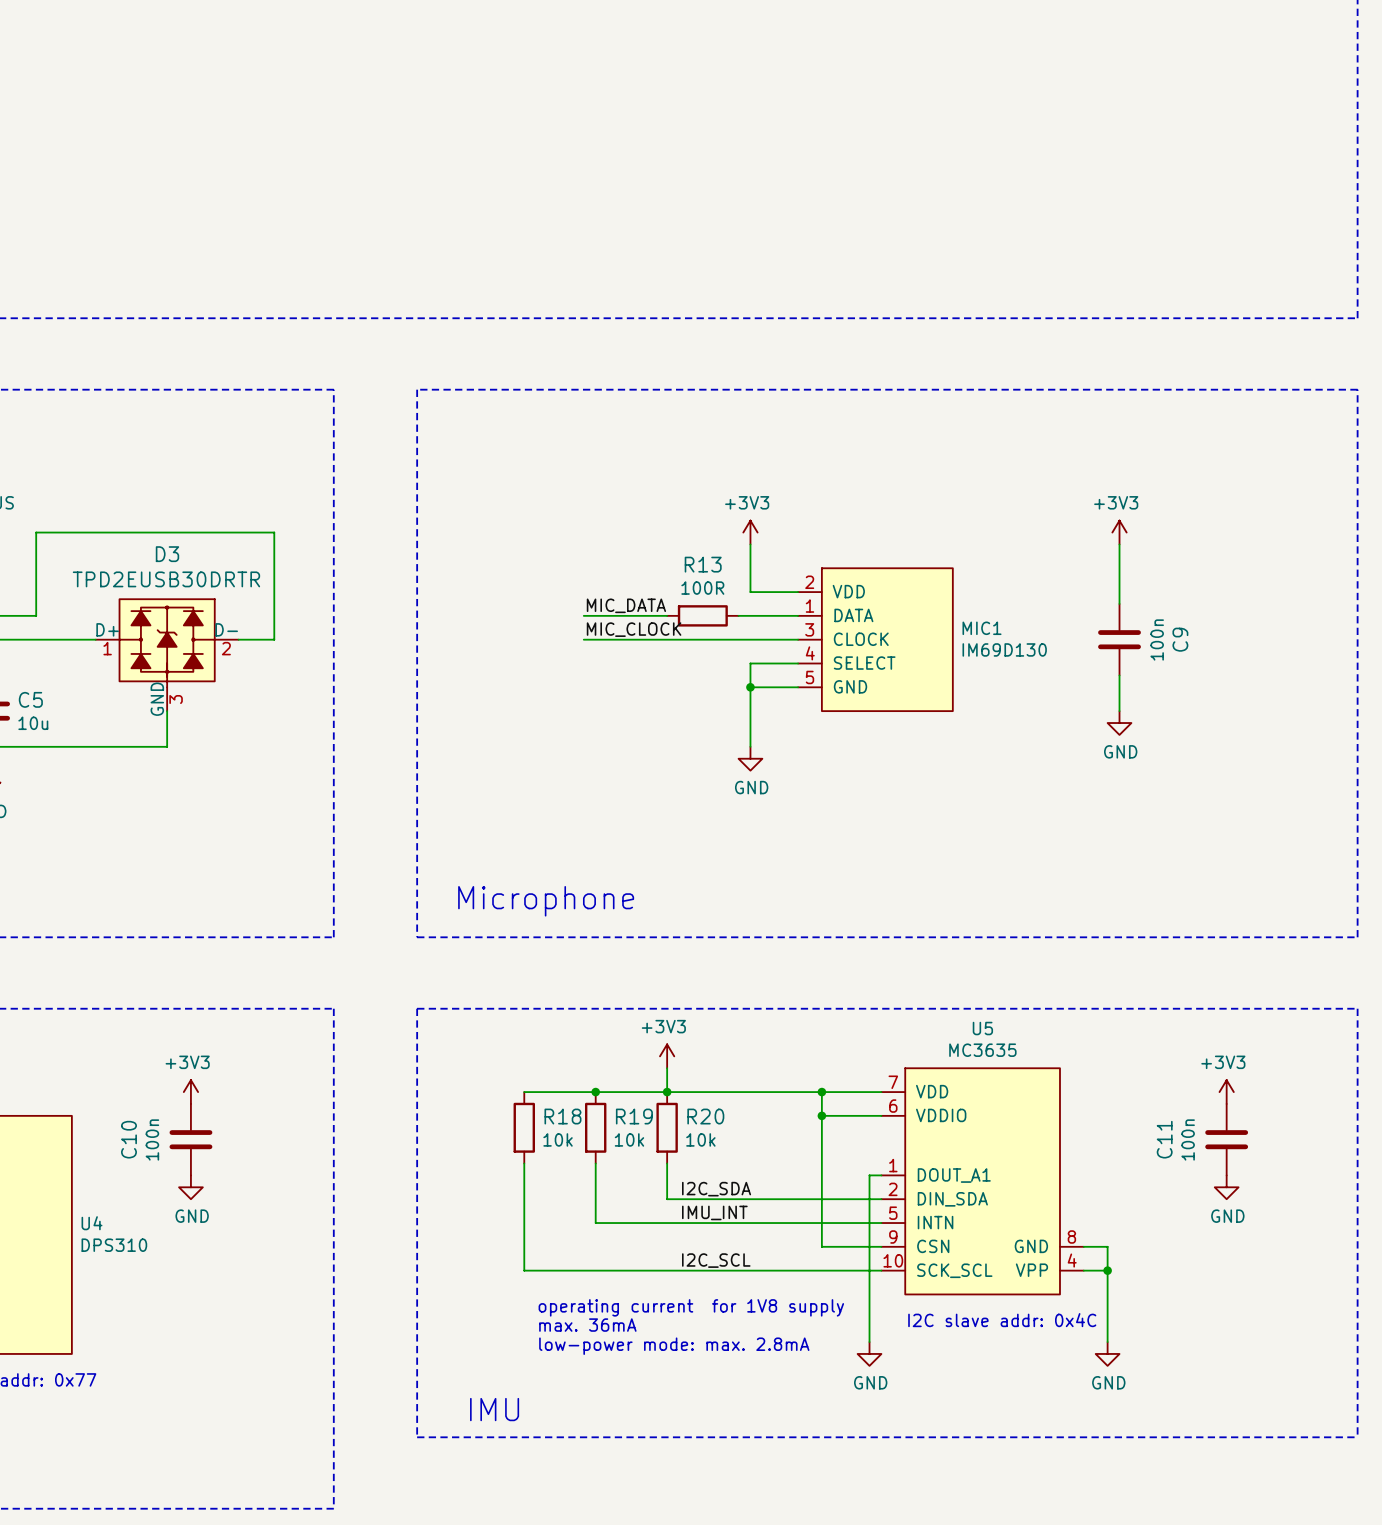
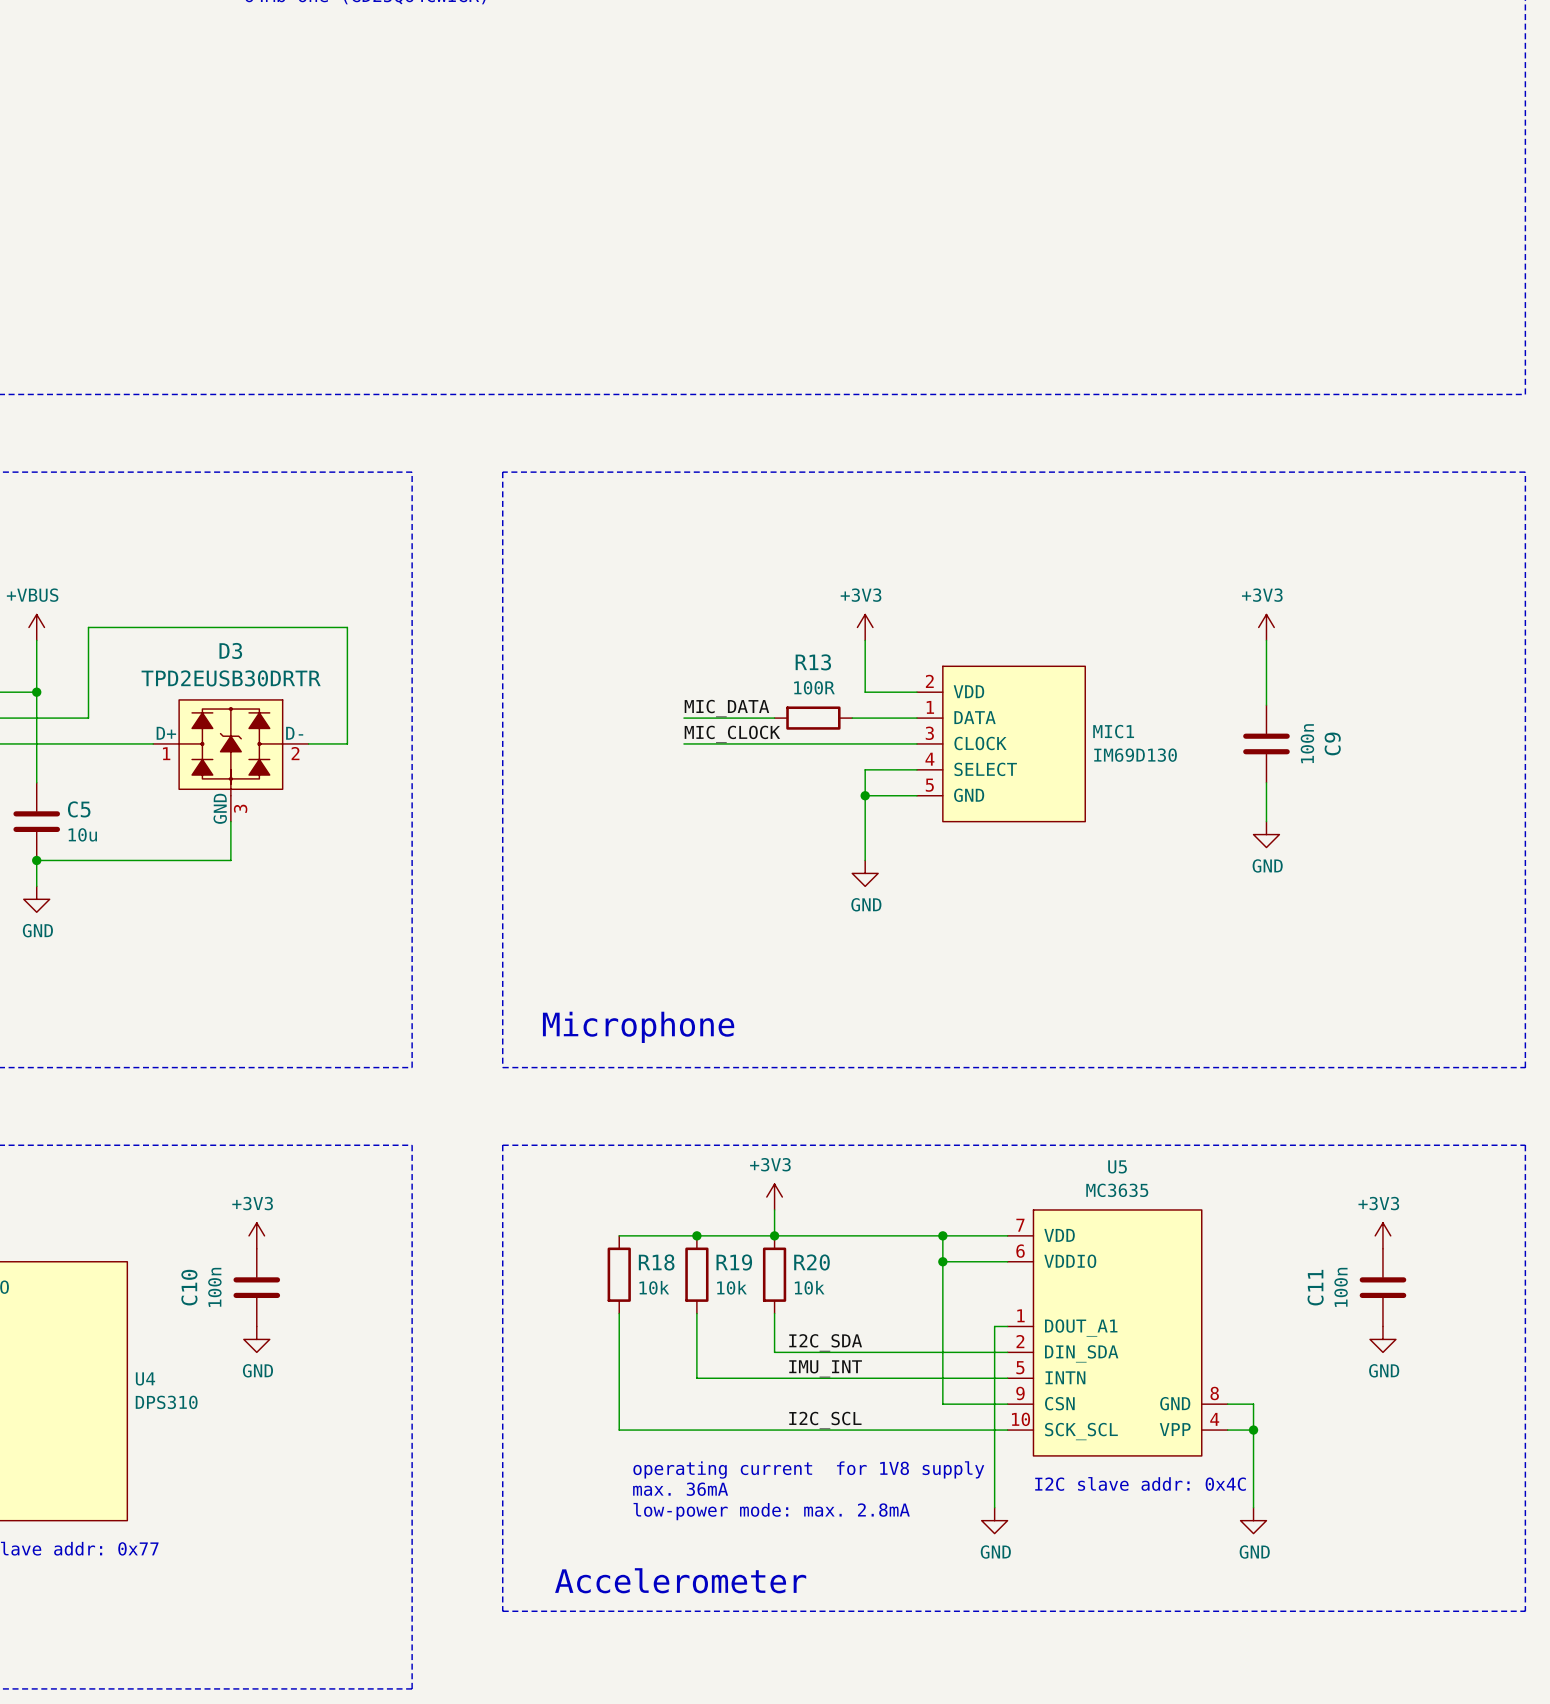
text: IMU (494, 1409) -> Accelerometer (680, 1580)

